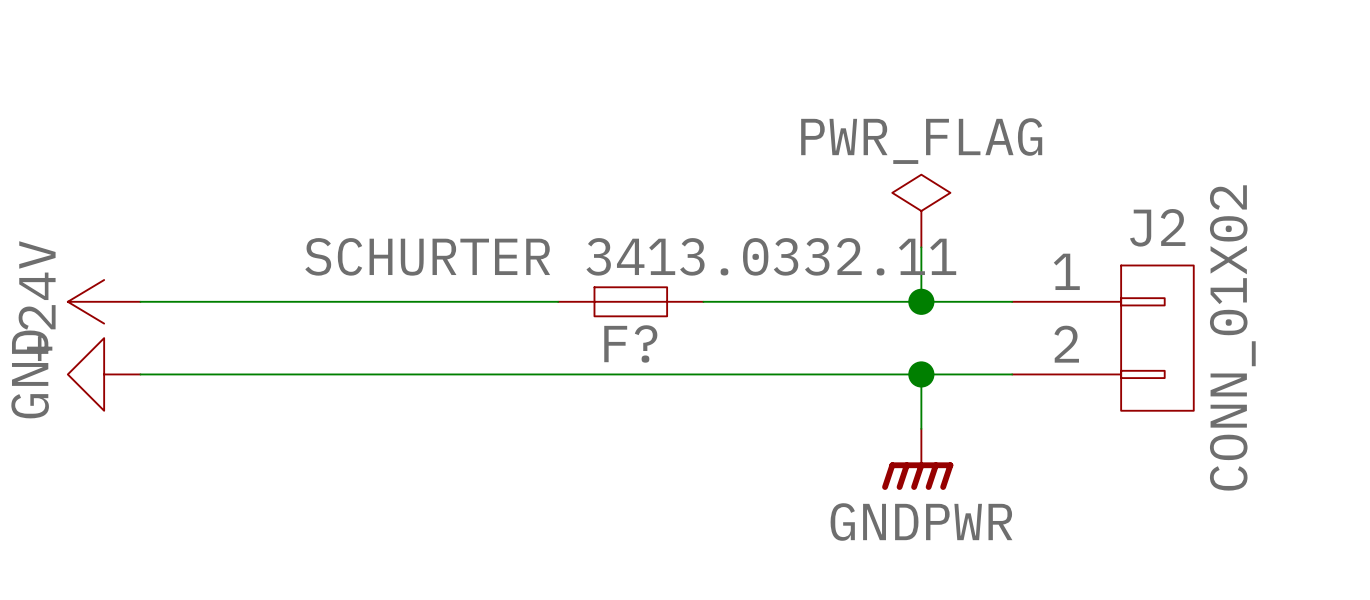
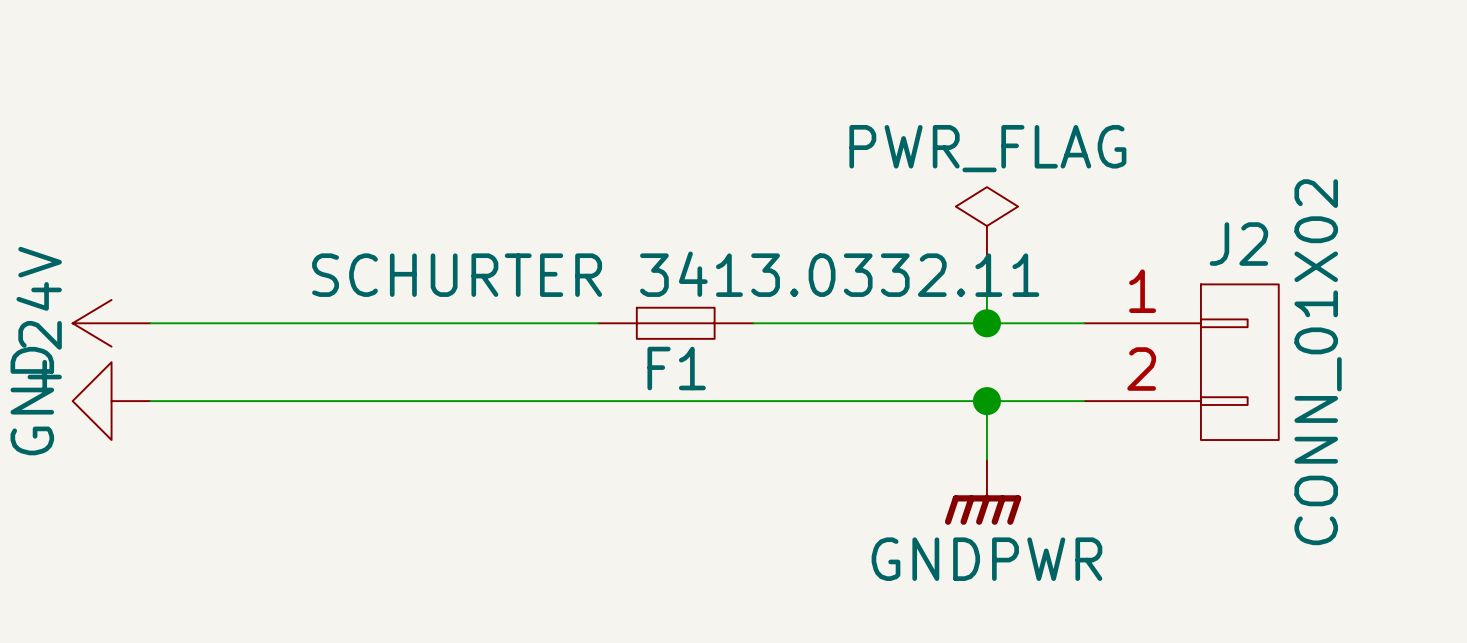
F? name: F? (630, 343) -> F1 (676, 368)

